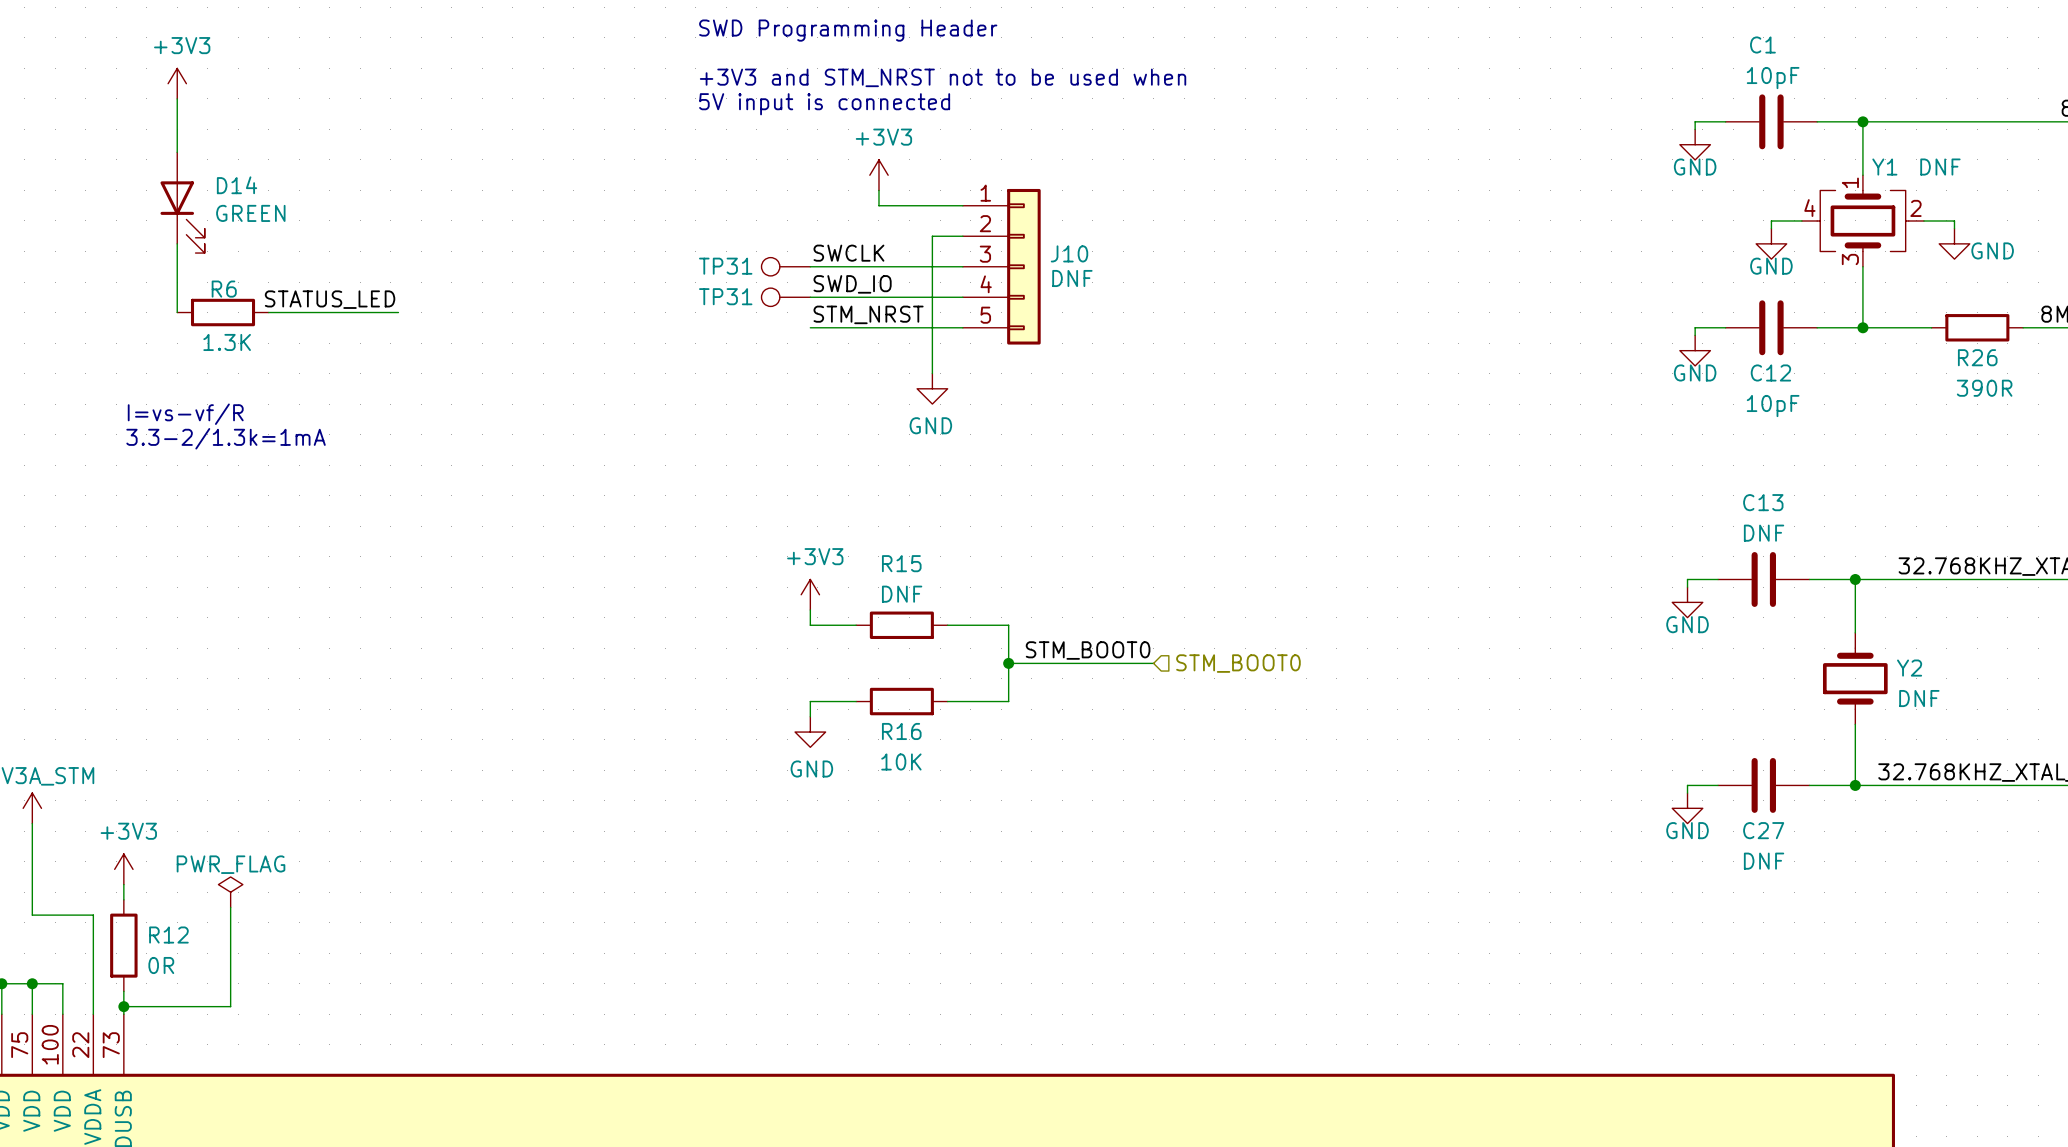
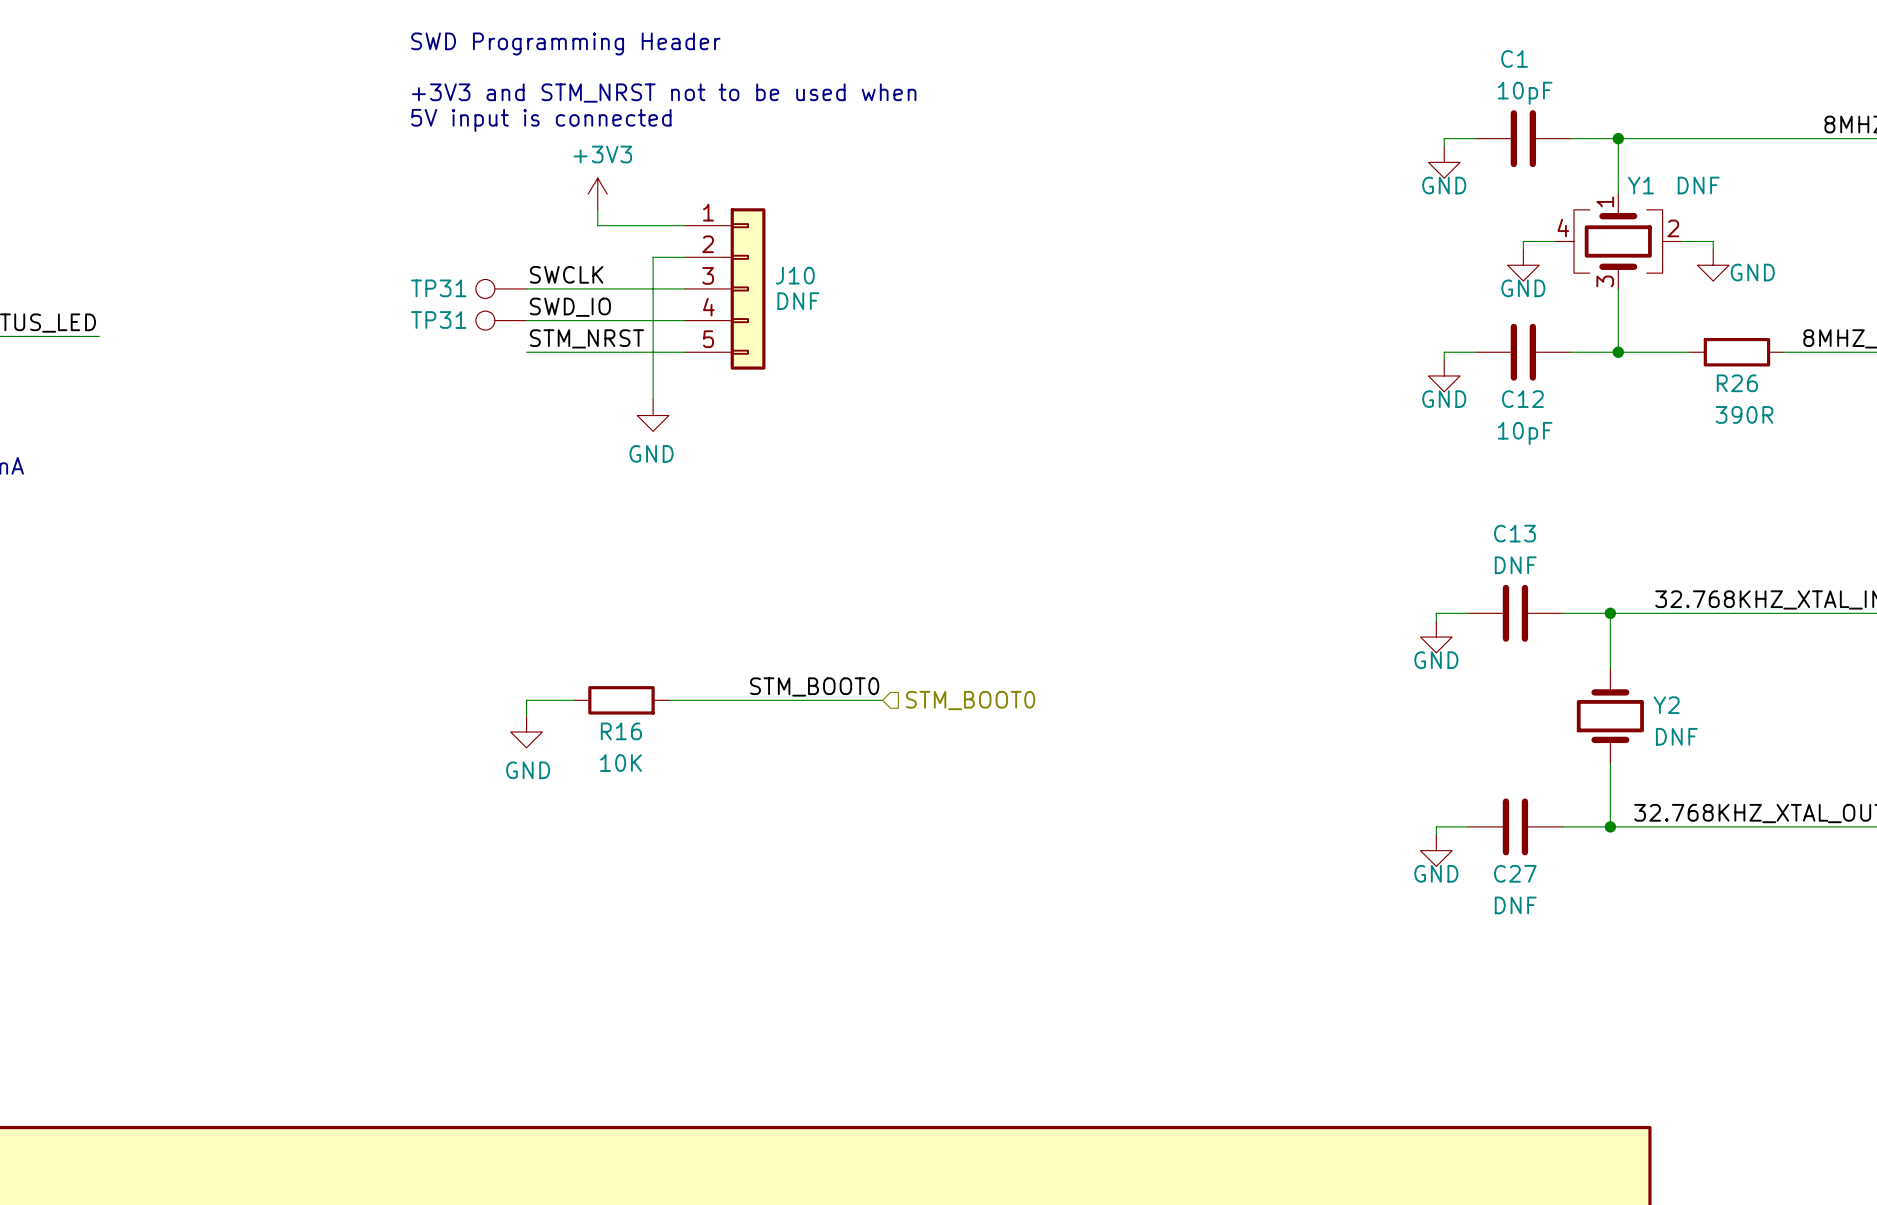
power symbol: +3V3 (810, 594) -> none
wire: (810, 610) (810, 625) (856, 625) -> none
R15: DNF (901, 625) -> none
wire: (947, 625) (1008, 625) (1008, 701) (947, 701) -> none
wire: none -> (668, 700) (732, 700)
junction: (1008, 663) -> none
wire: (856, 701) (810, 701) (810, 716) -> (574, 700) (526, 700) (526, 716)
R16 position: (901, 701) -> (621, 700)
power symbol position: GND (810, 732) -> GND (526, 731)

